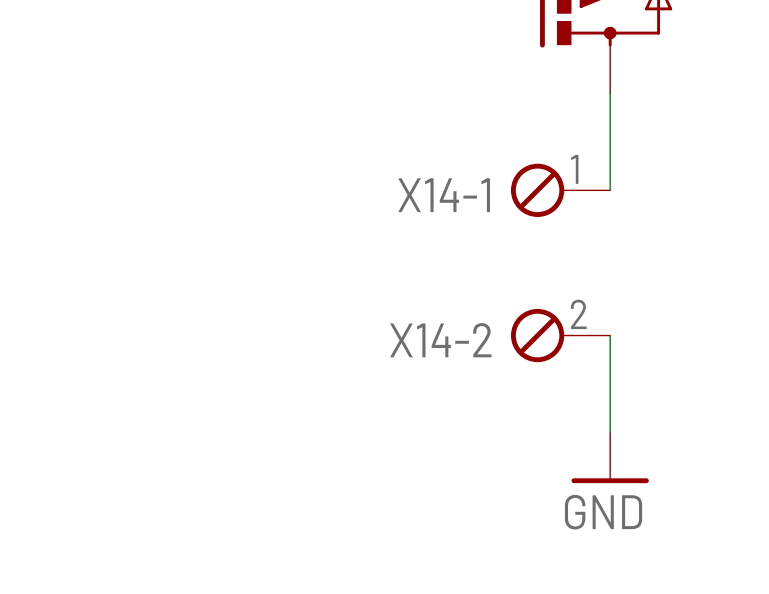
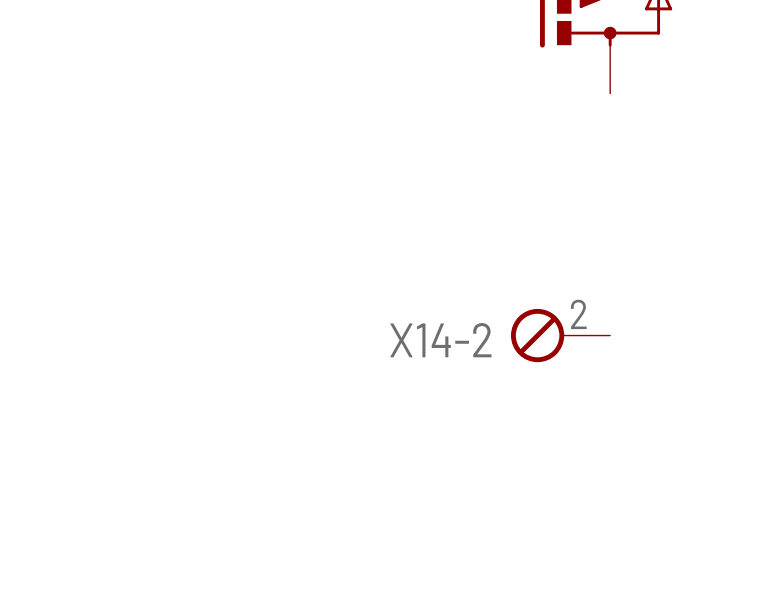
wire: (610, 93) (610, 190) -> none
X14-1: (560, 190) -> none
wire: (610, 335) (610, 432) -> none
power symbol: GND (610, 457) -> none

